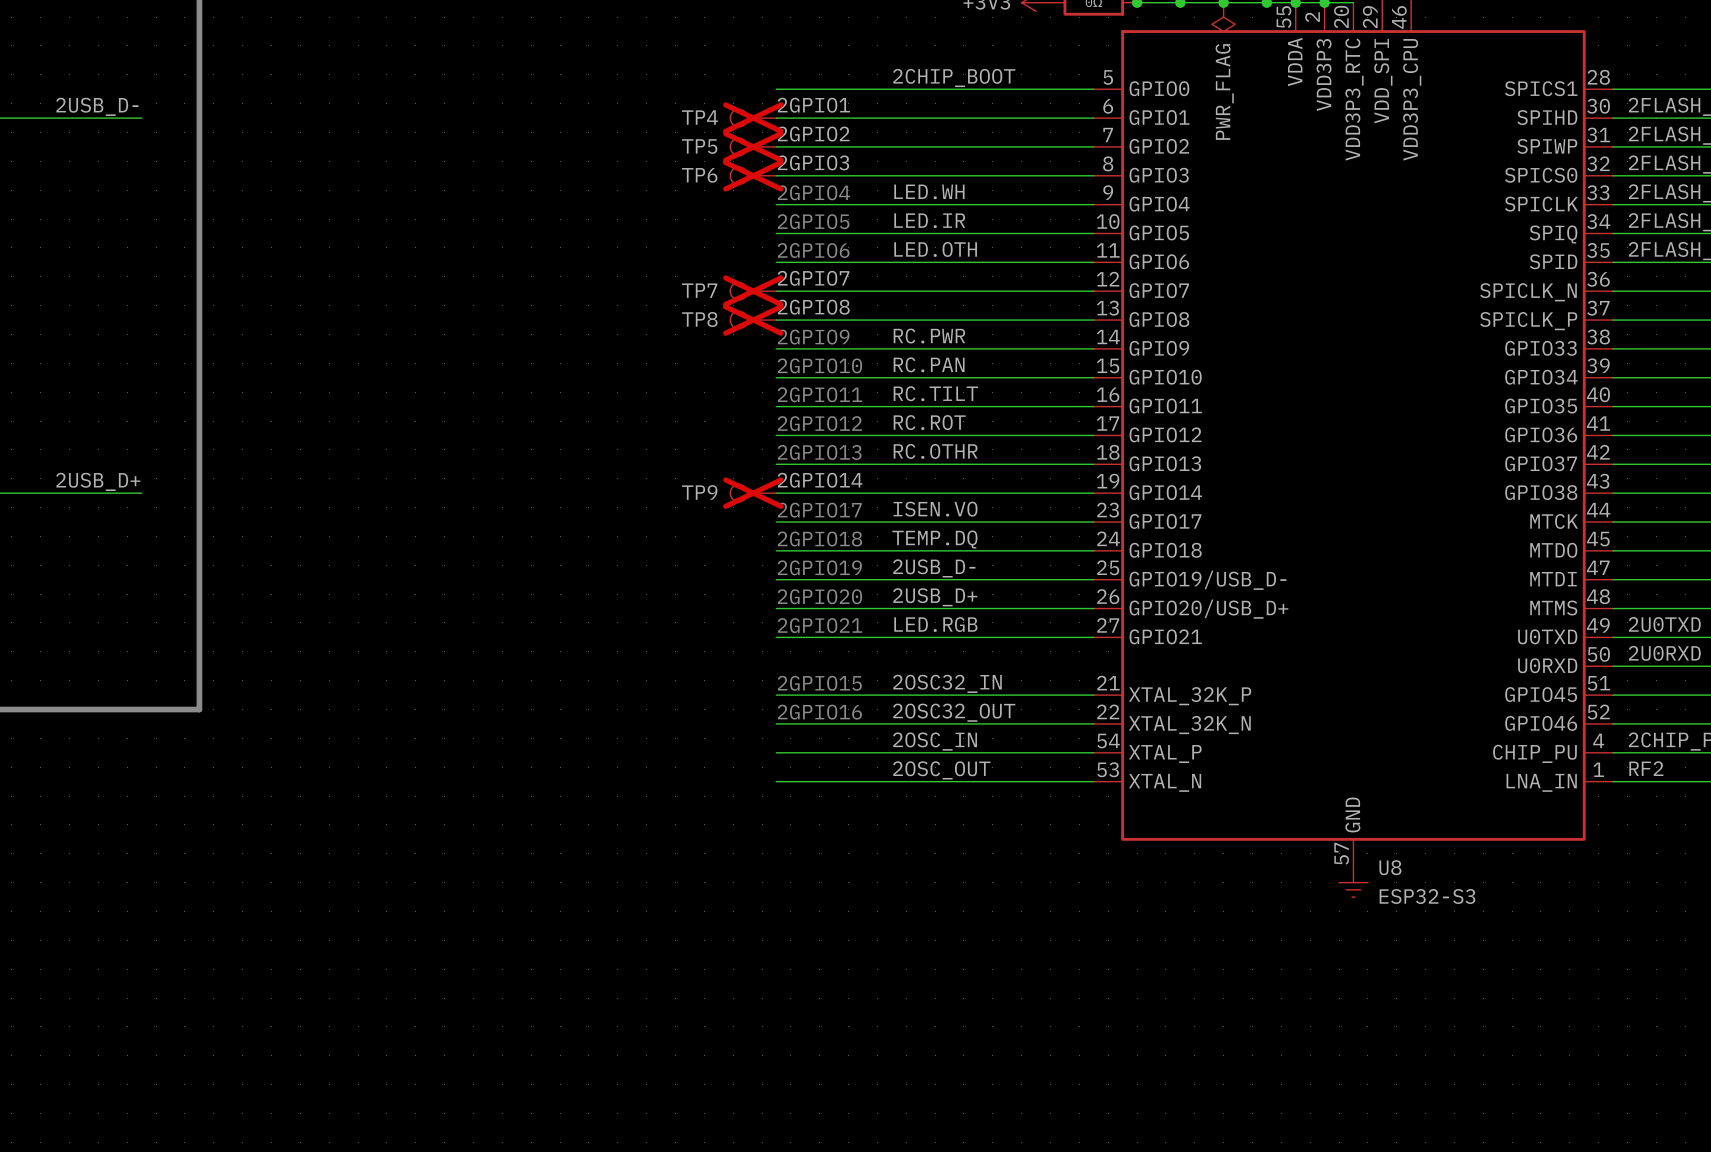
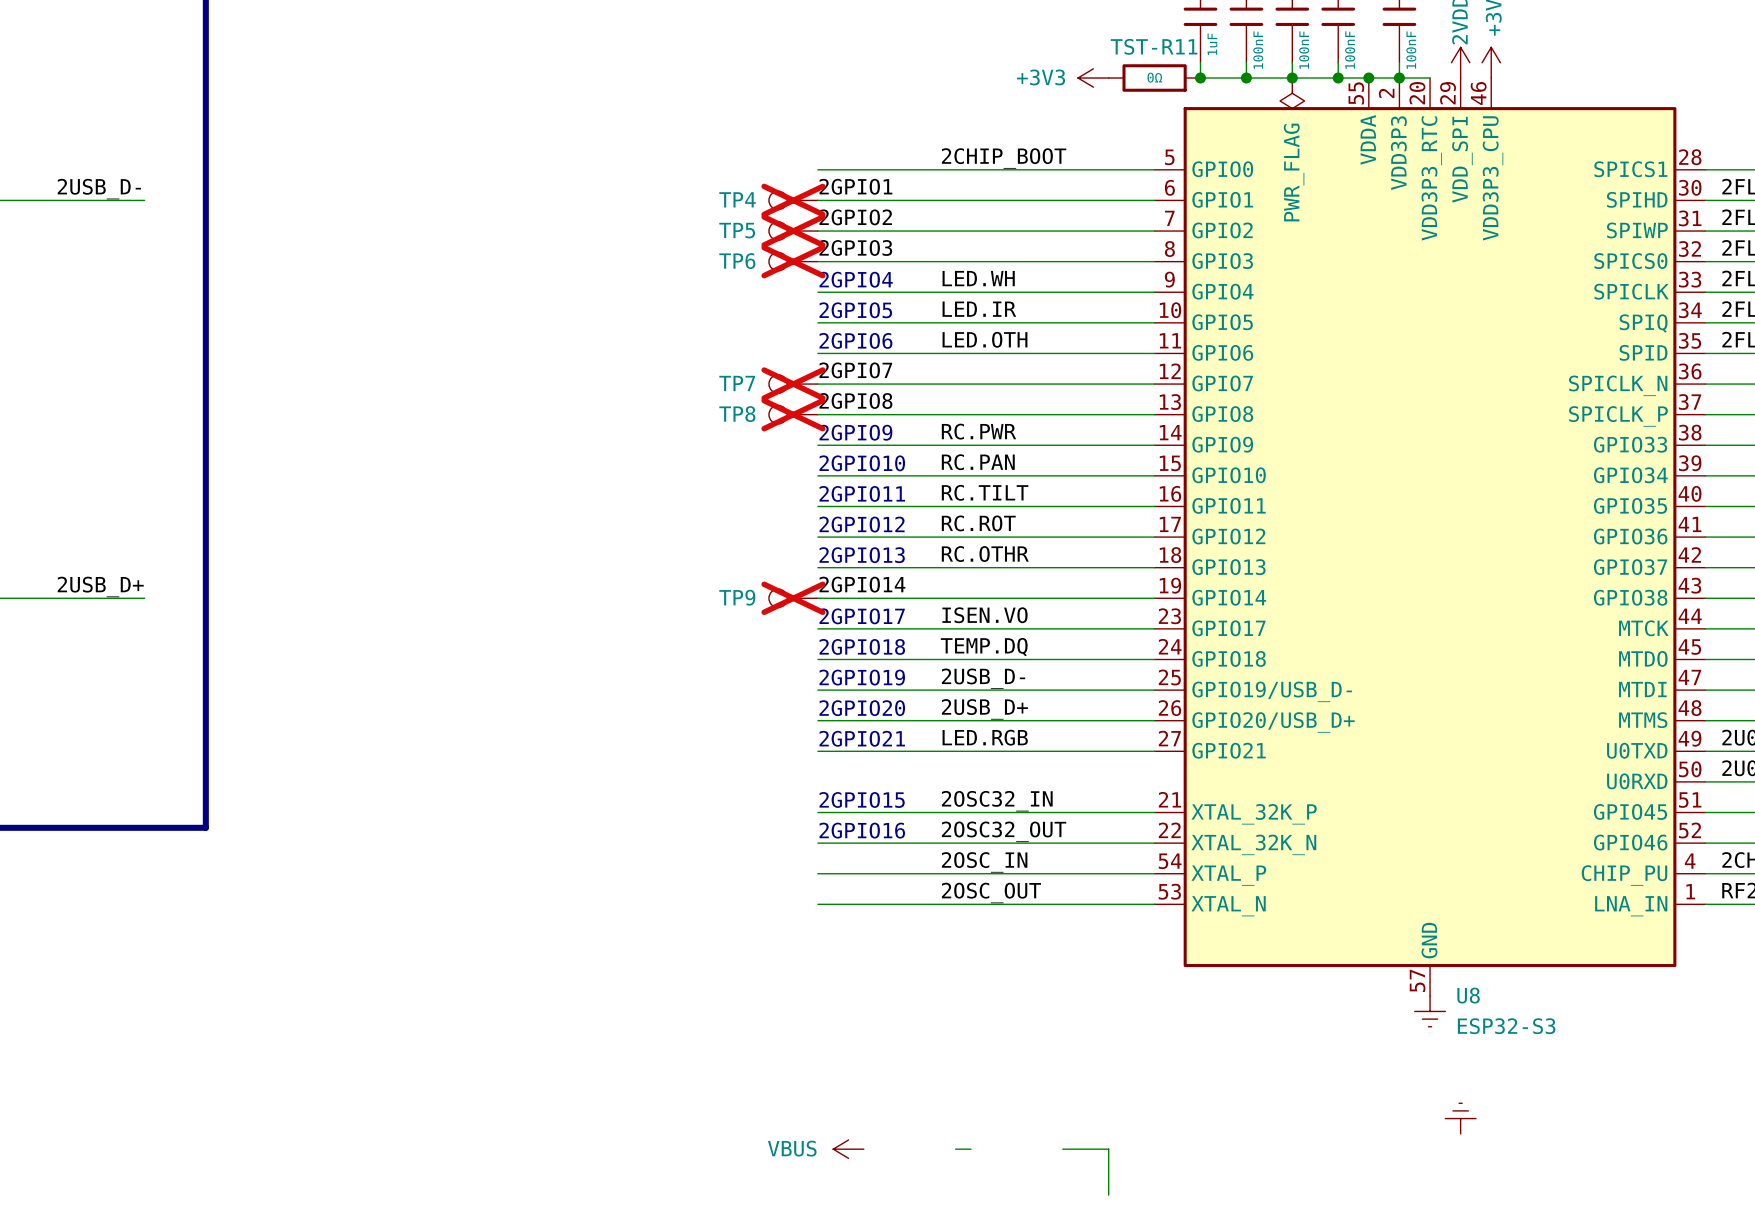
power symbol: none -> (1460, 1118)
power symbol: none -> VBUS (848, 1149)
wire: none -> (955, 1149) (970, 1149)
wire: none -> (1062, 1149) (1108, 1149) (1108, 1195)

